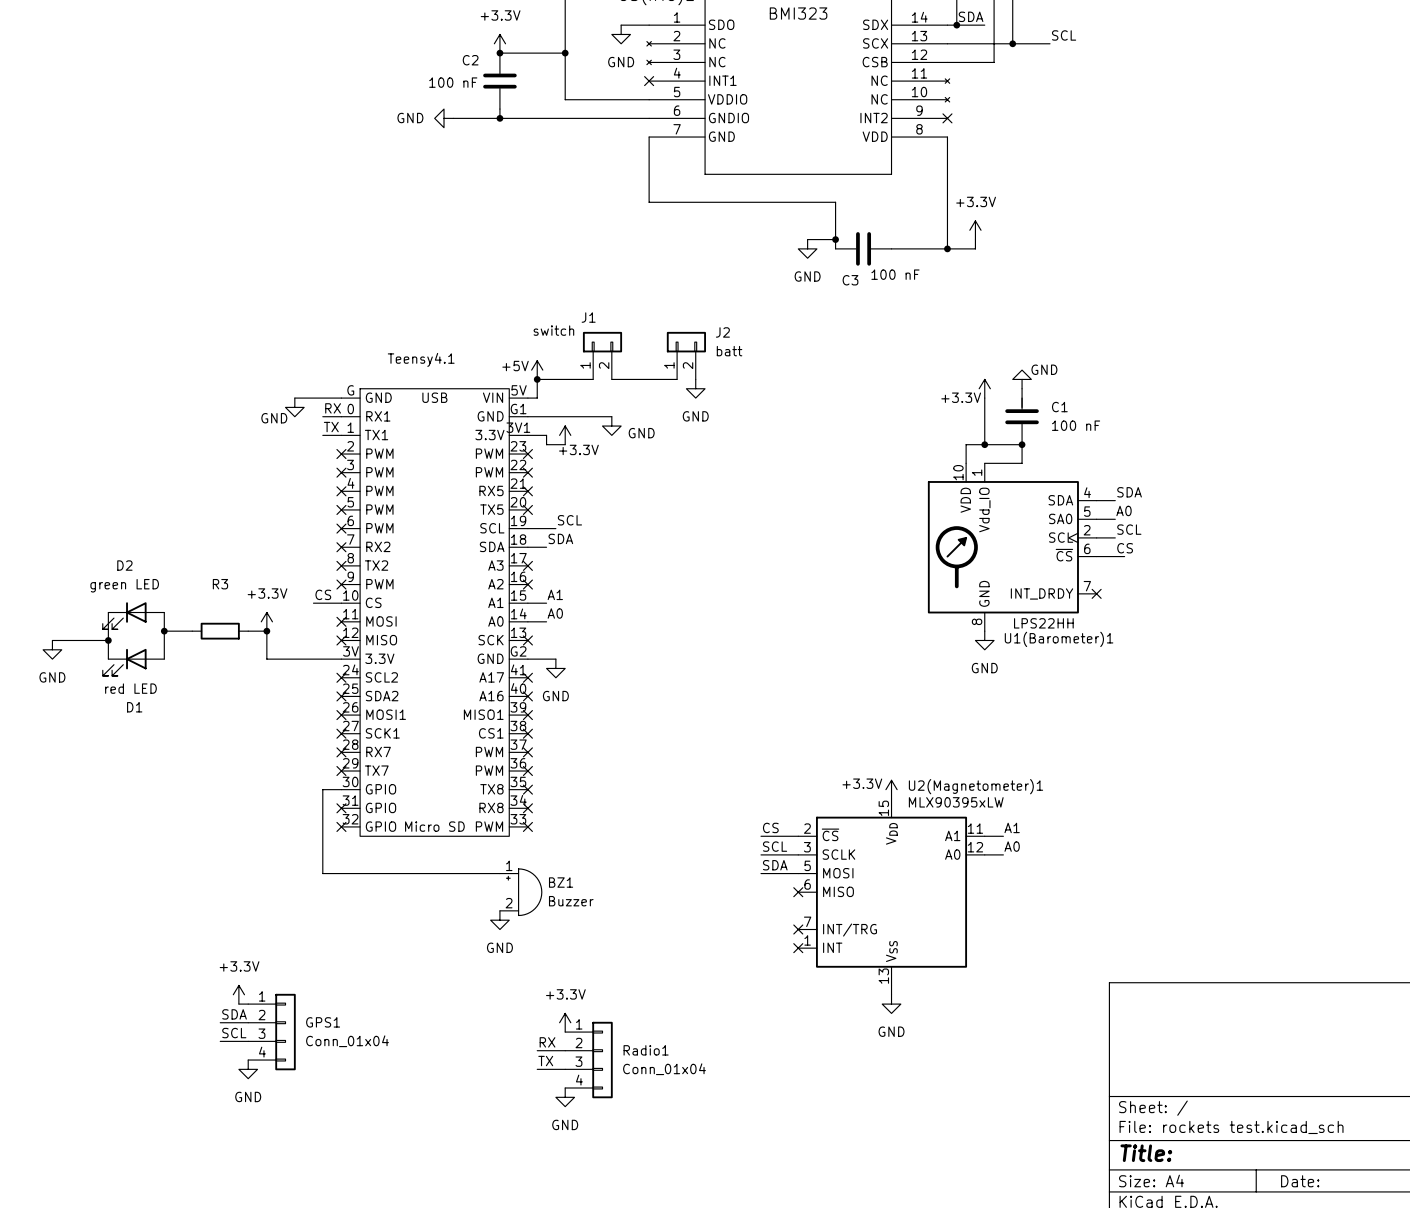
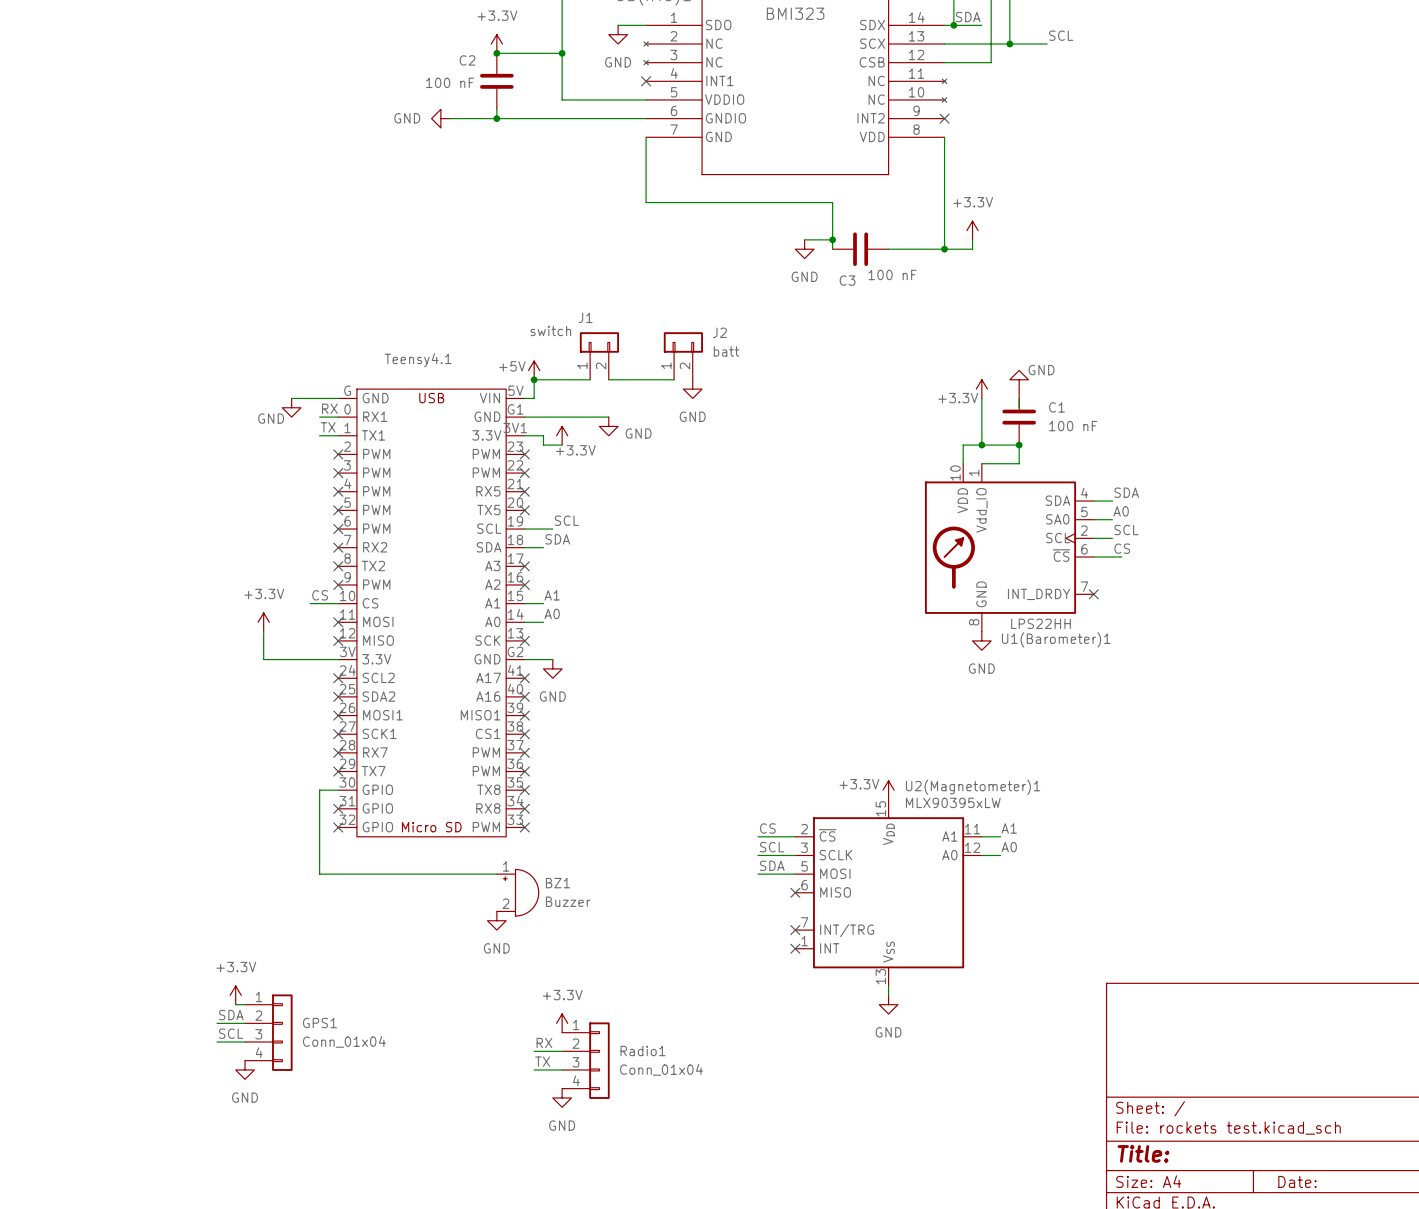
wire: (108, 612) (108, 659) -> none
wire: (164, 612) (164, 659) -> none
D2: green LED (133, 615) -> none
wire: (164, 631) (192, 631) -> none
junction: (164, 631) -> none
R3: (220, 631) -> none
wire: (248, 631) (266, 631) -> none
junction: (266, 631) -> none
wire: (52, 640) (108, 640) -> none
junction: (108, 640) -> none
power symbol: GND (52, 649) -> none
D1: red LED (133, 662) -> none

